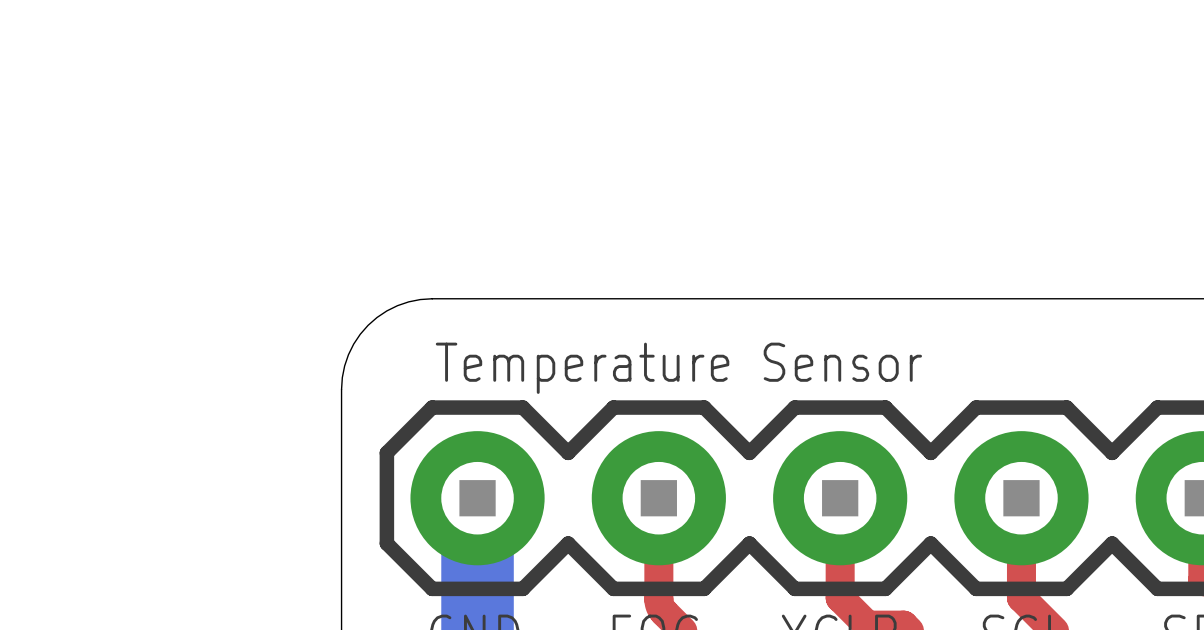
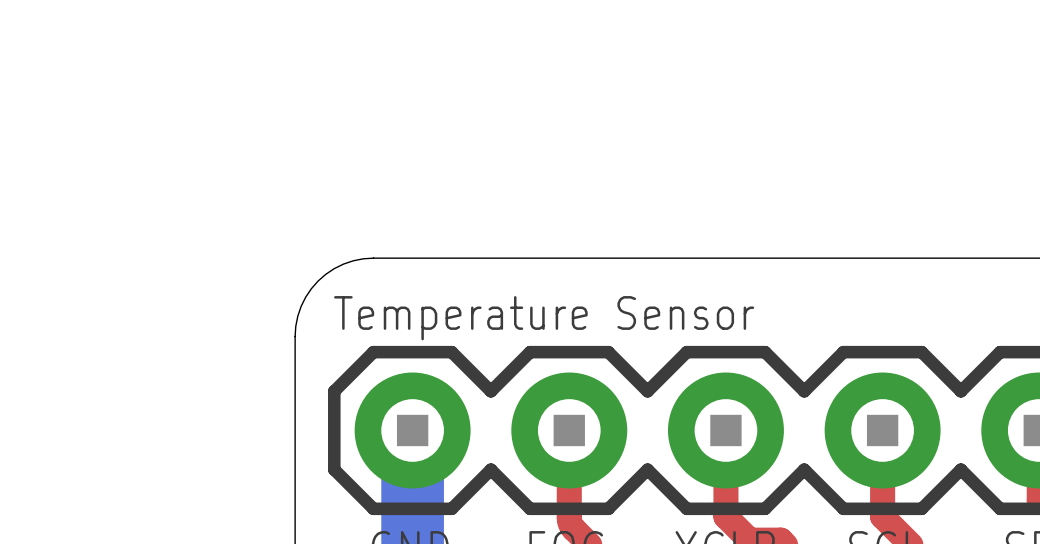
text position: Temperature Sensor (678, 368) -> Temperature Sensor (544, 318)

